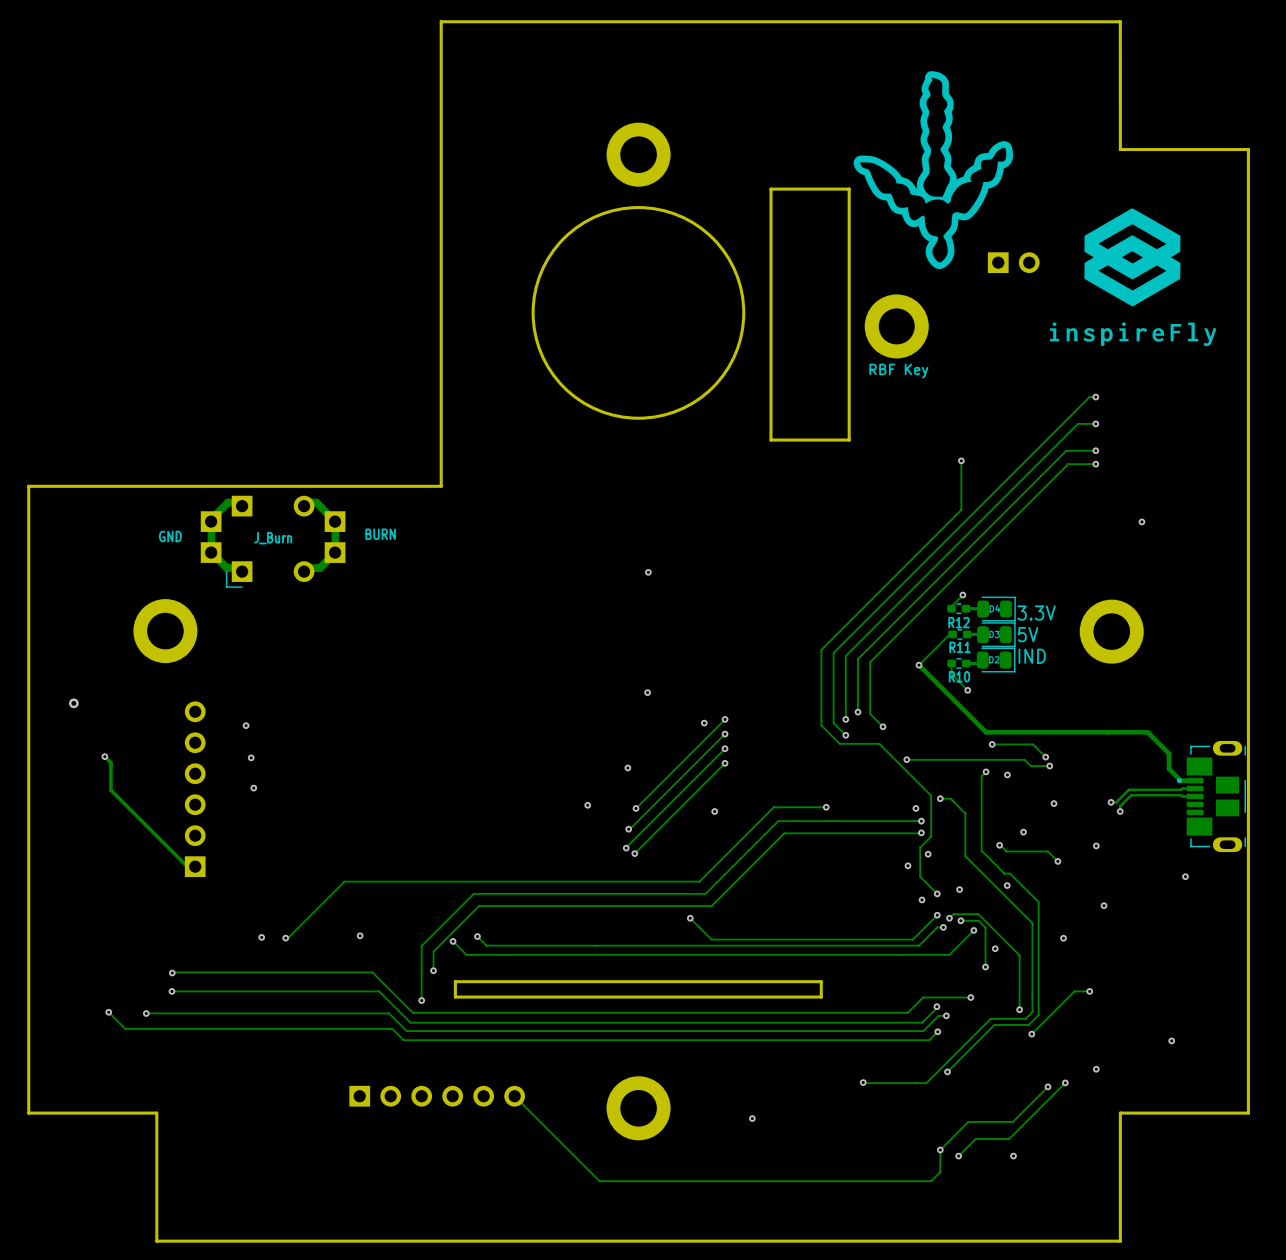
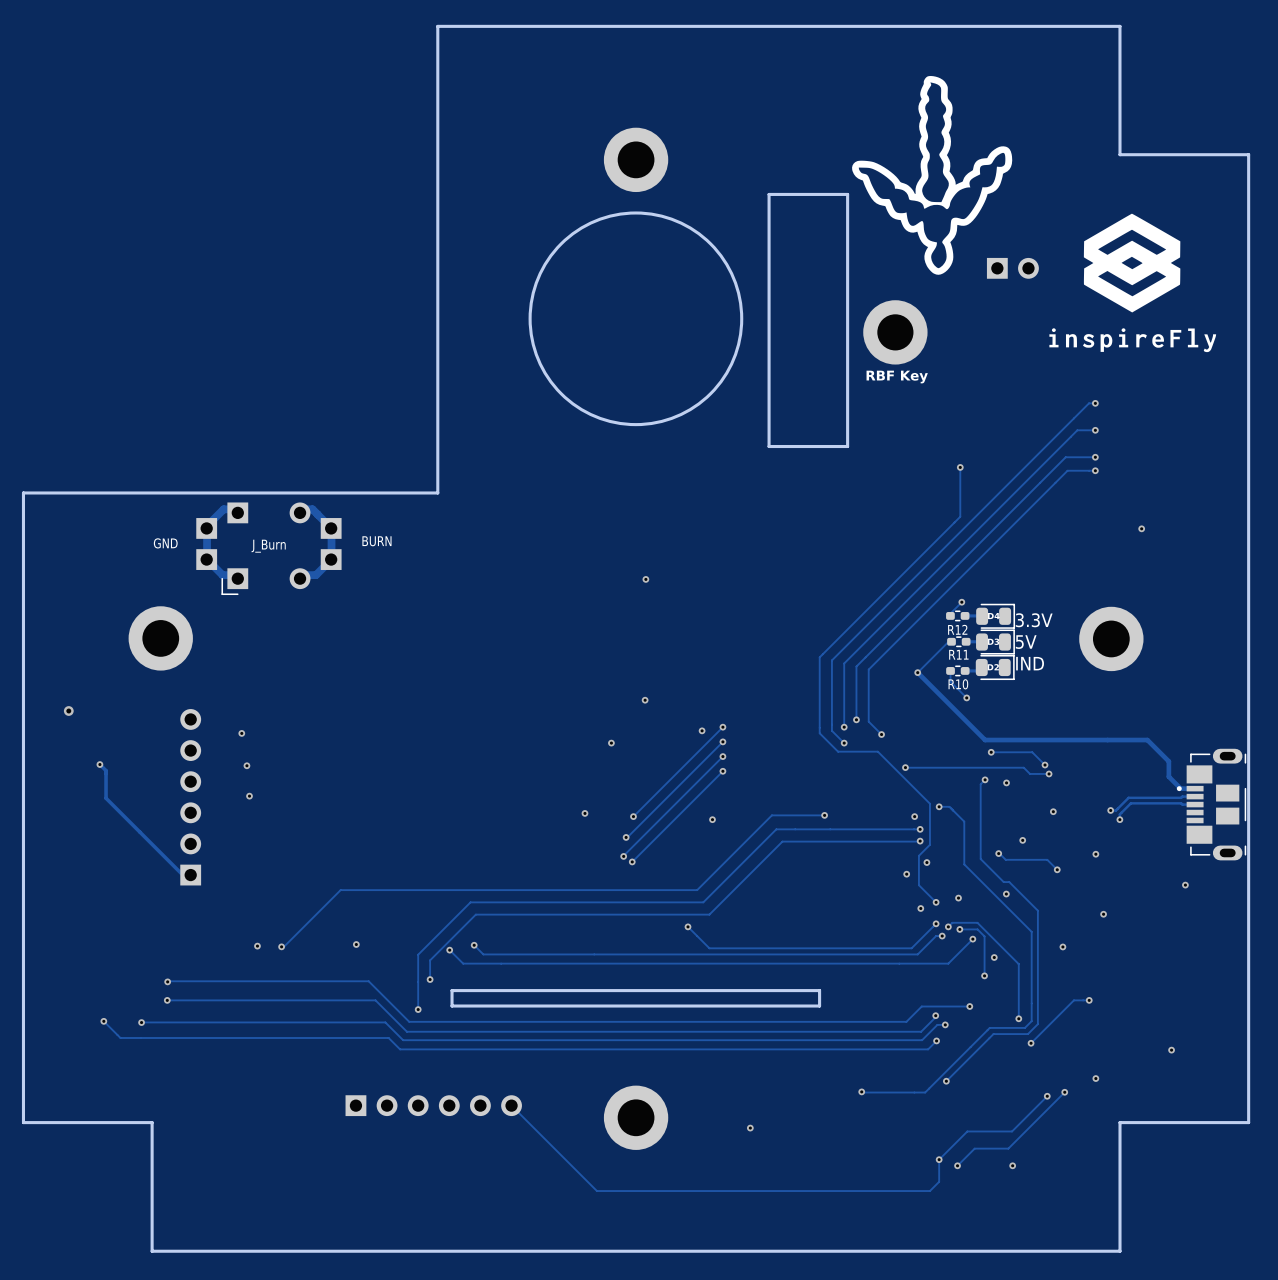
via position: (627, 767) -> (611, 743)

